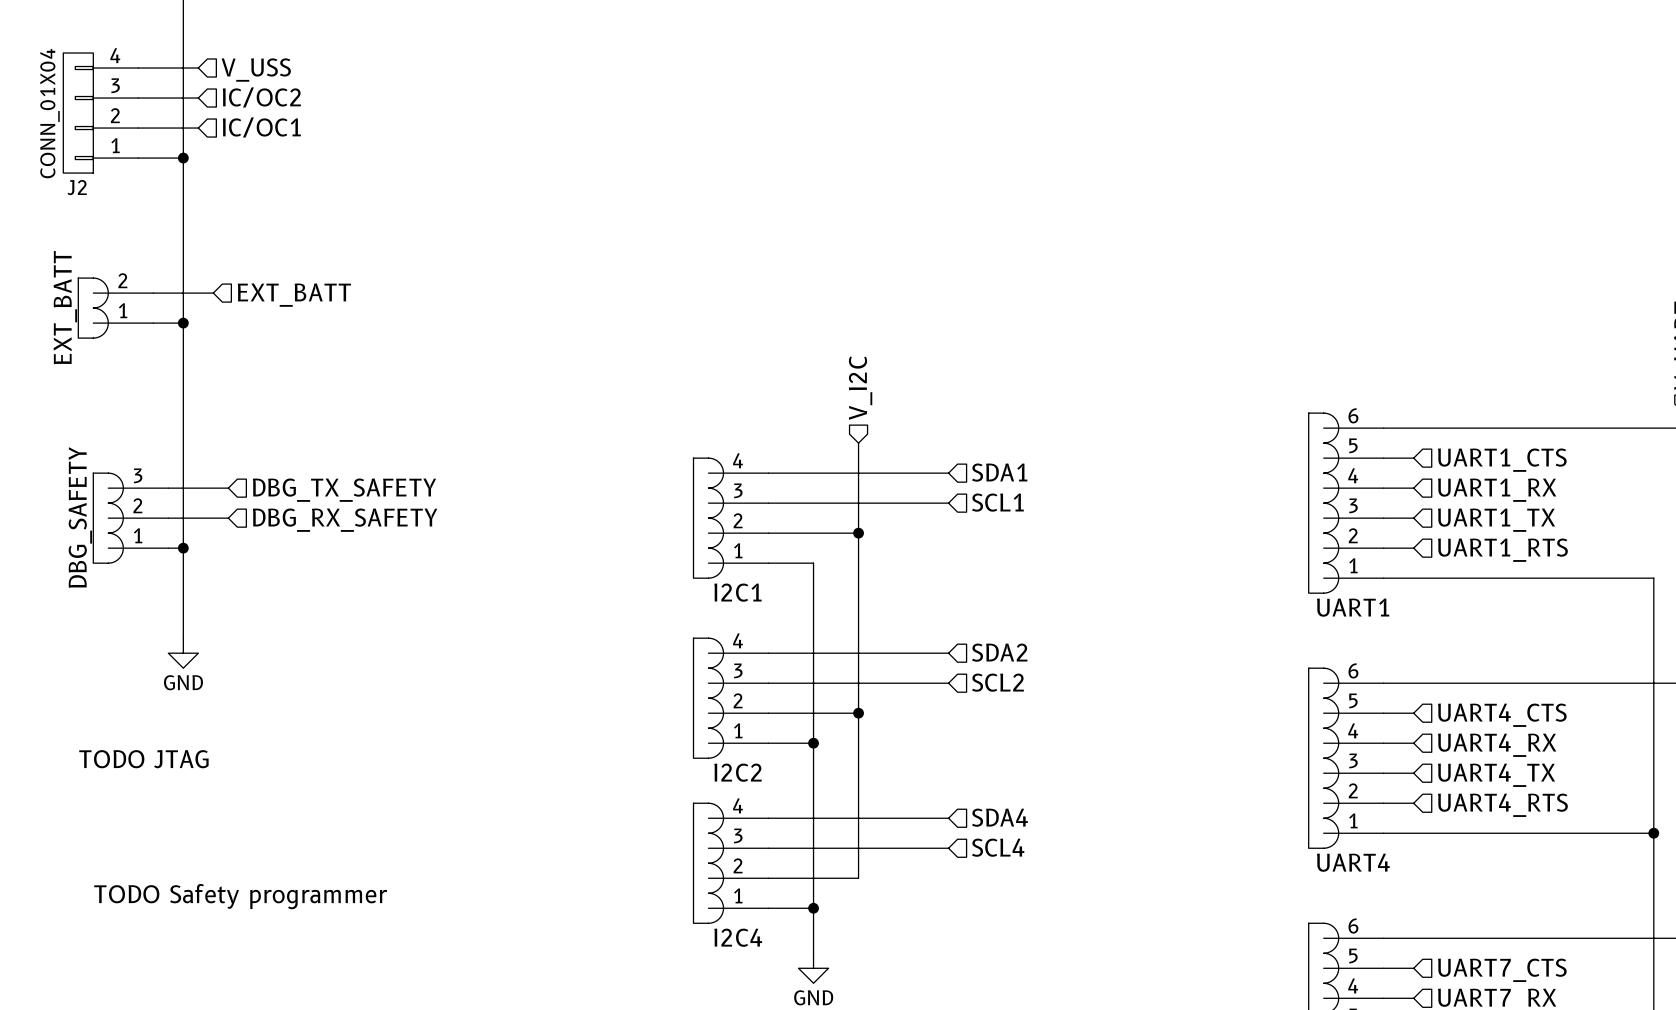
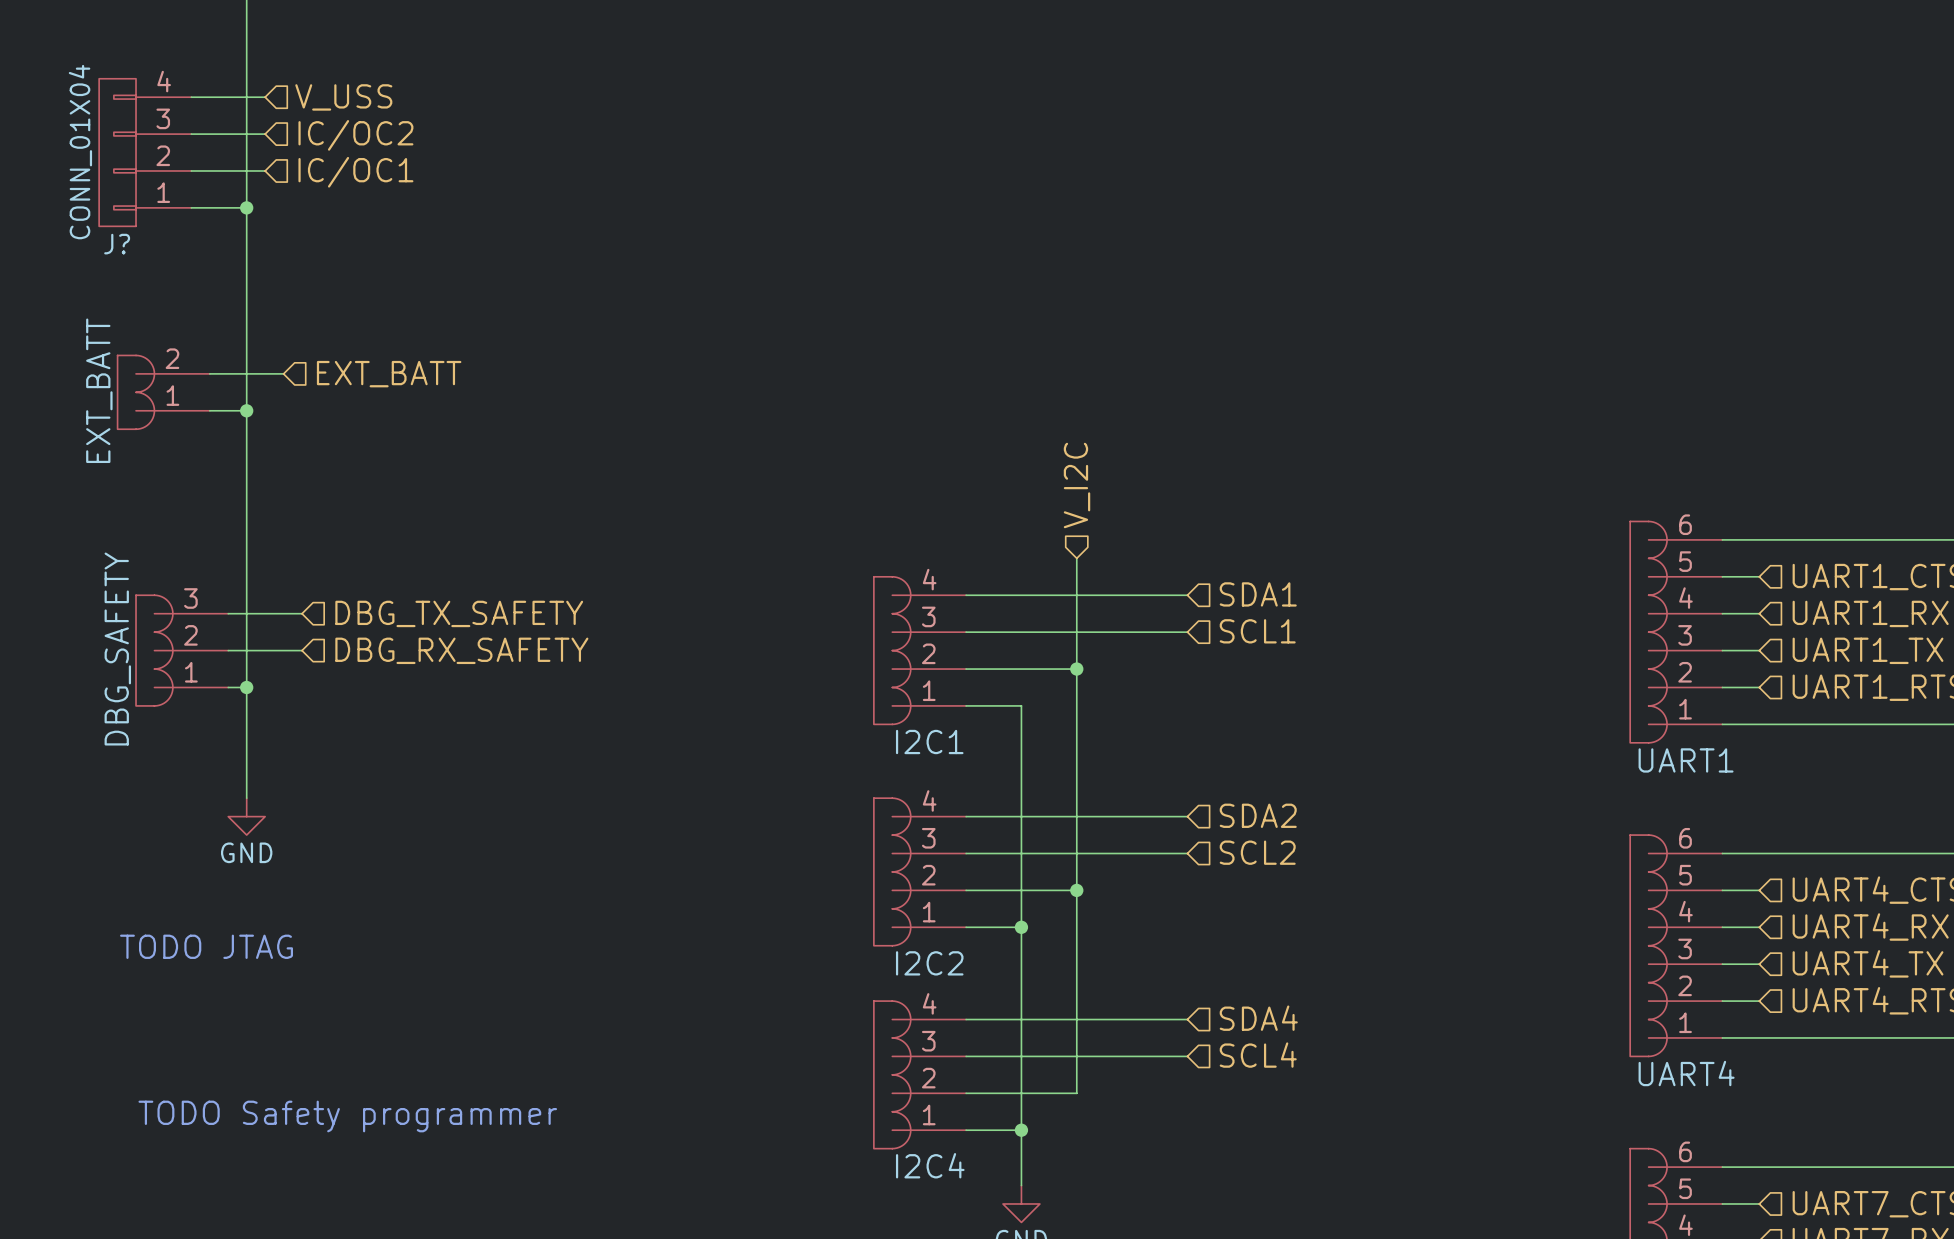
J2 name: J2 (77, 187) -> J? (117, 244)

